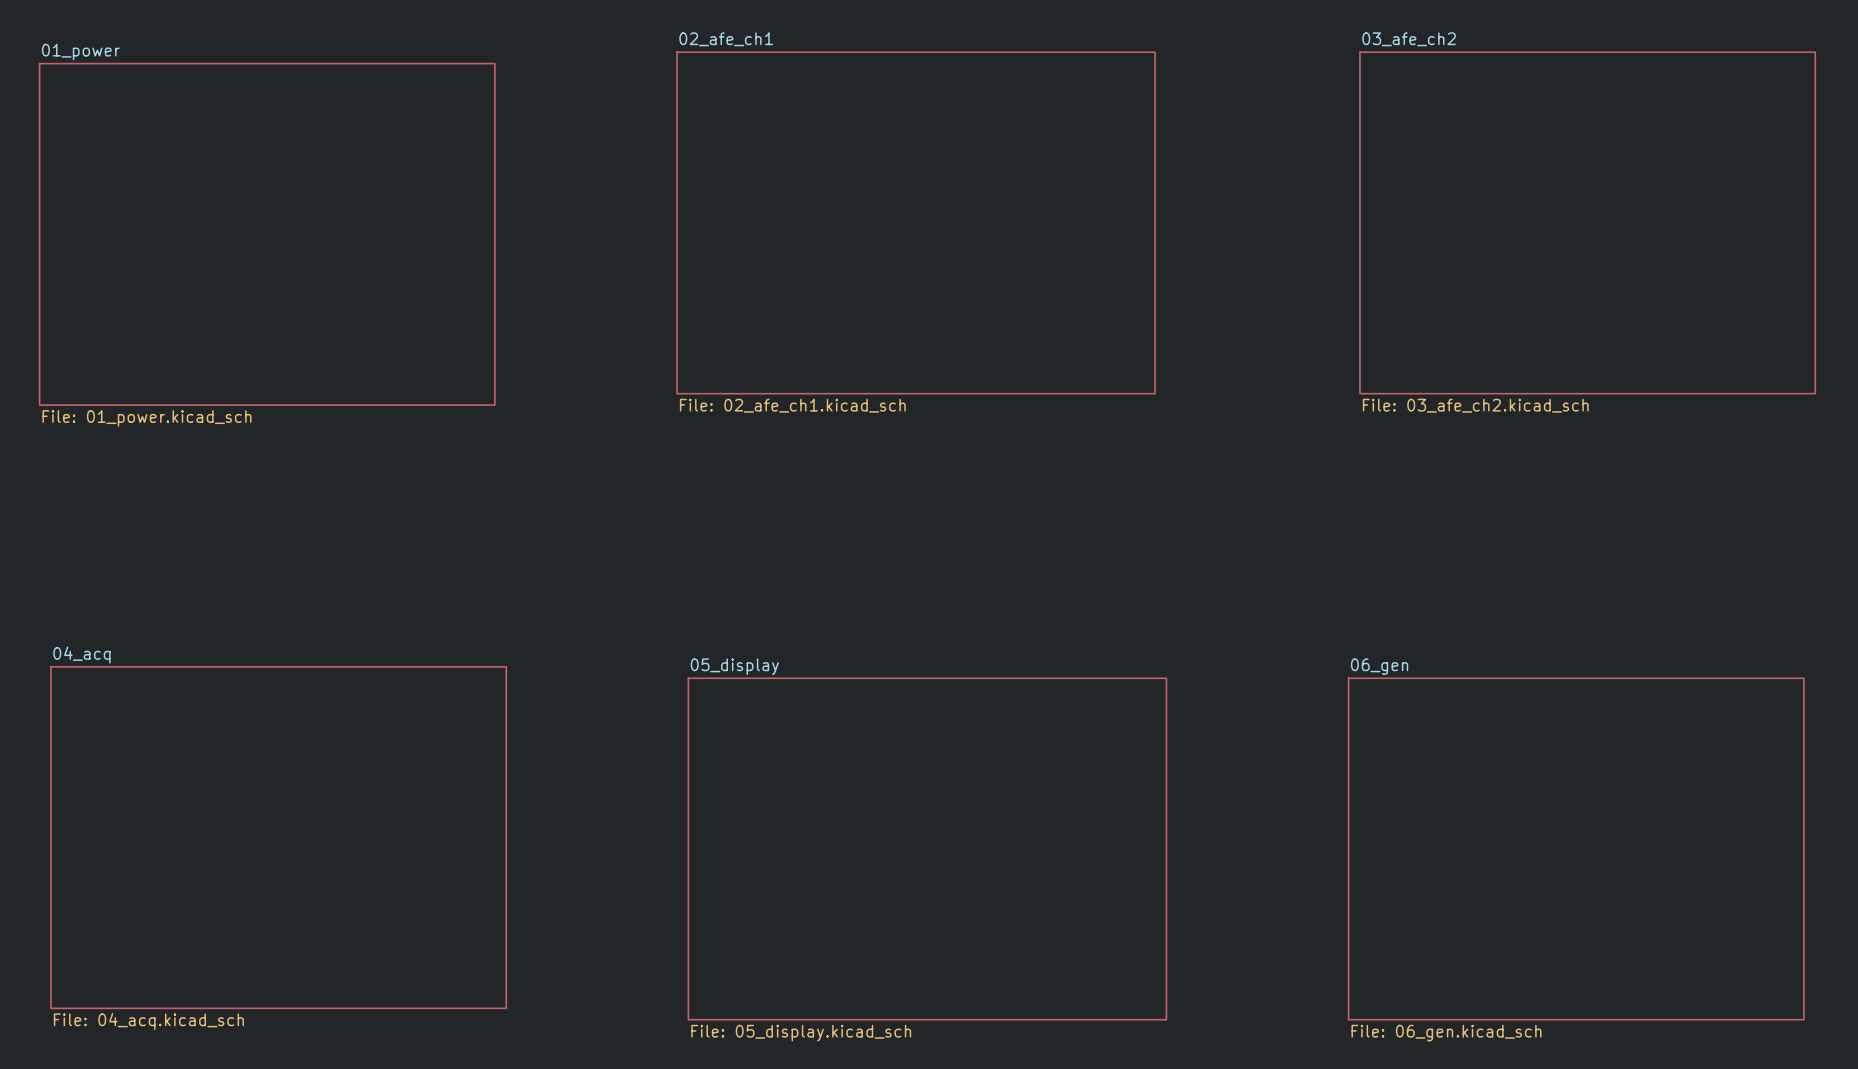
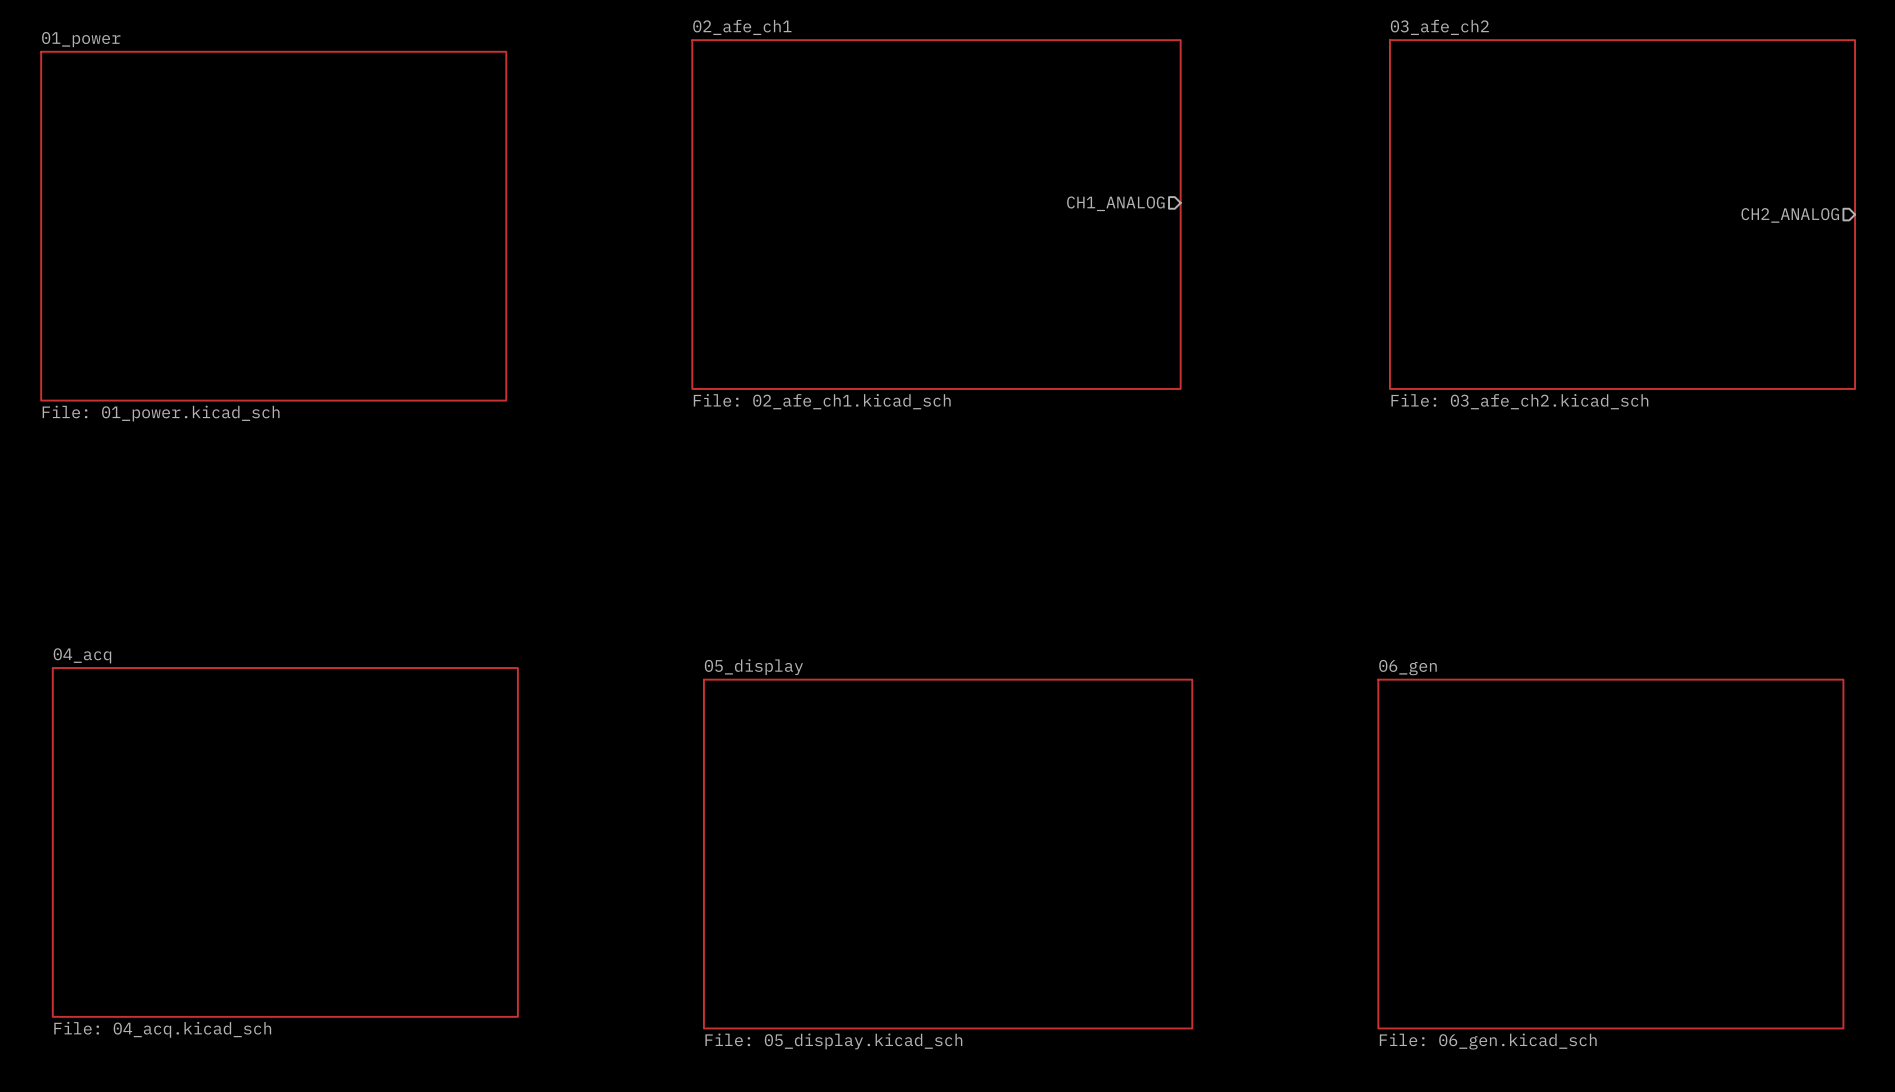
sheet pin: none -> CH1_ANALOG (1115, 203)
sheet pin: none -> CH2_ANALOG (1790, 215)

